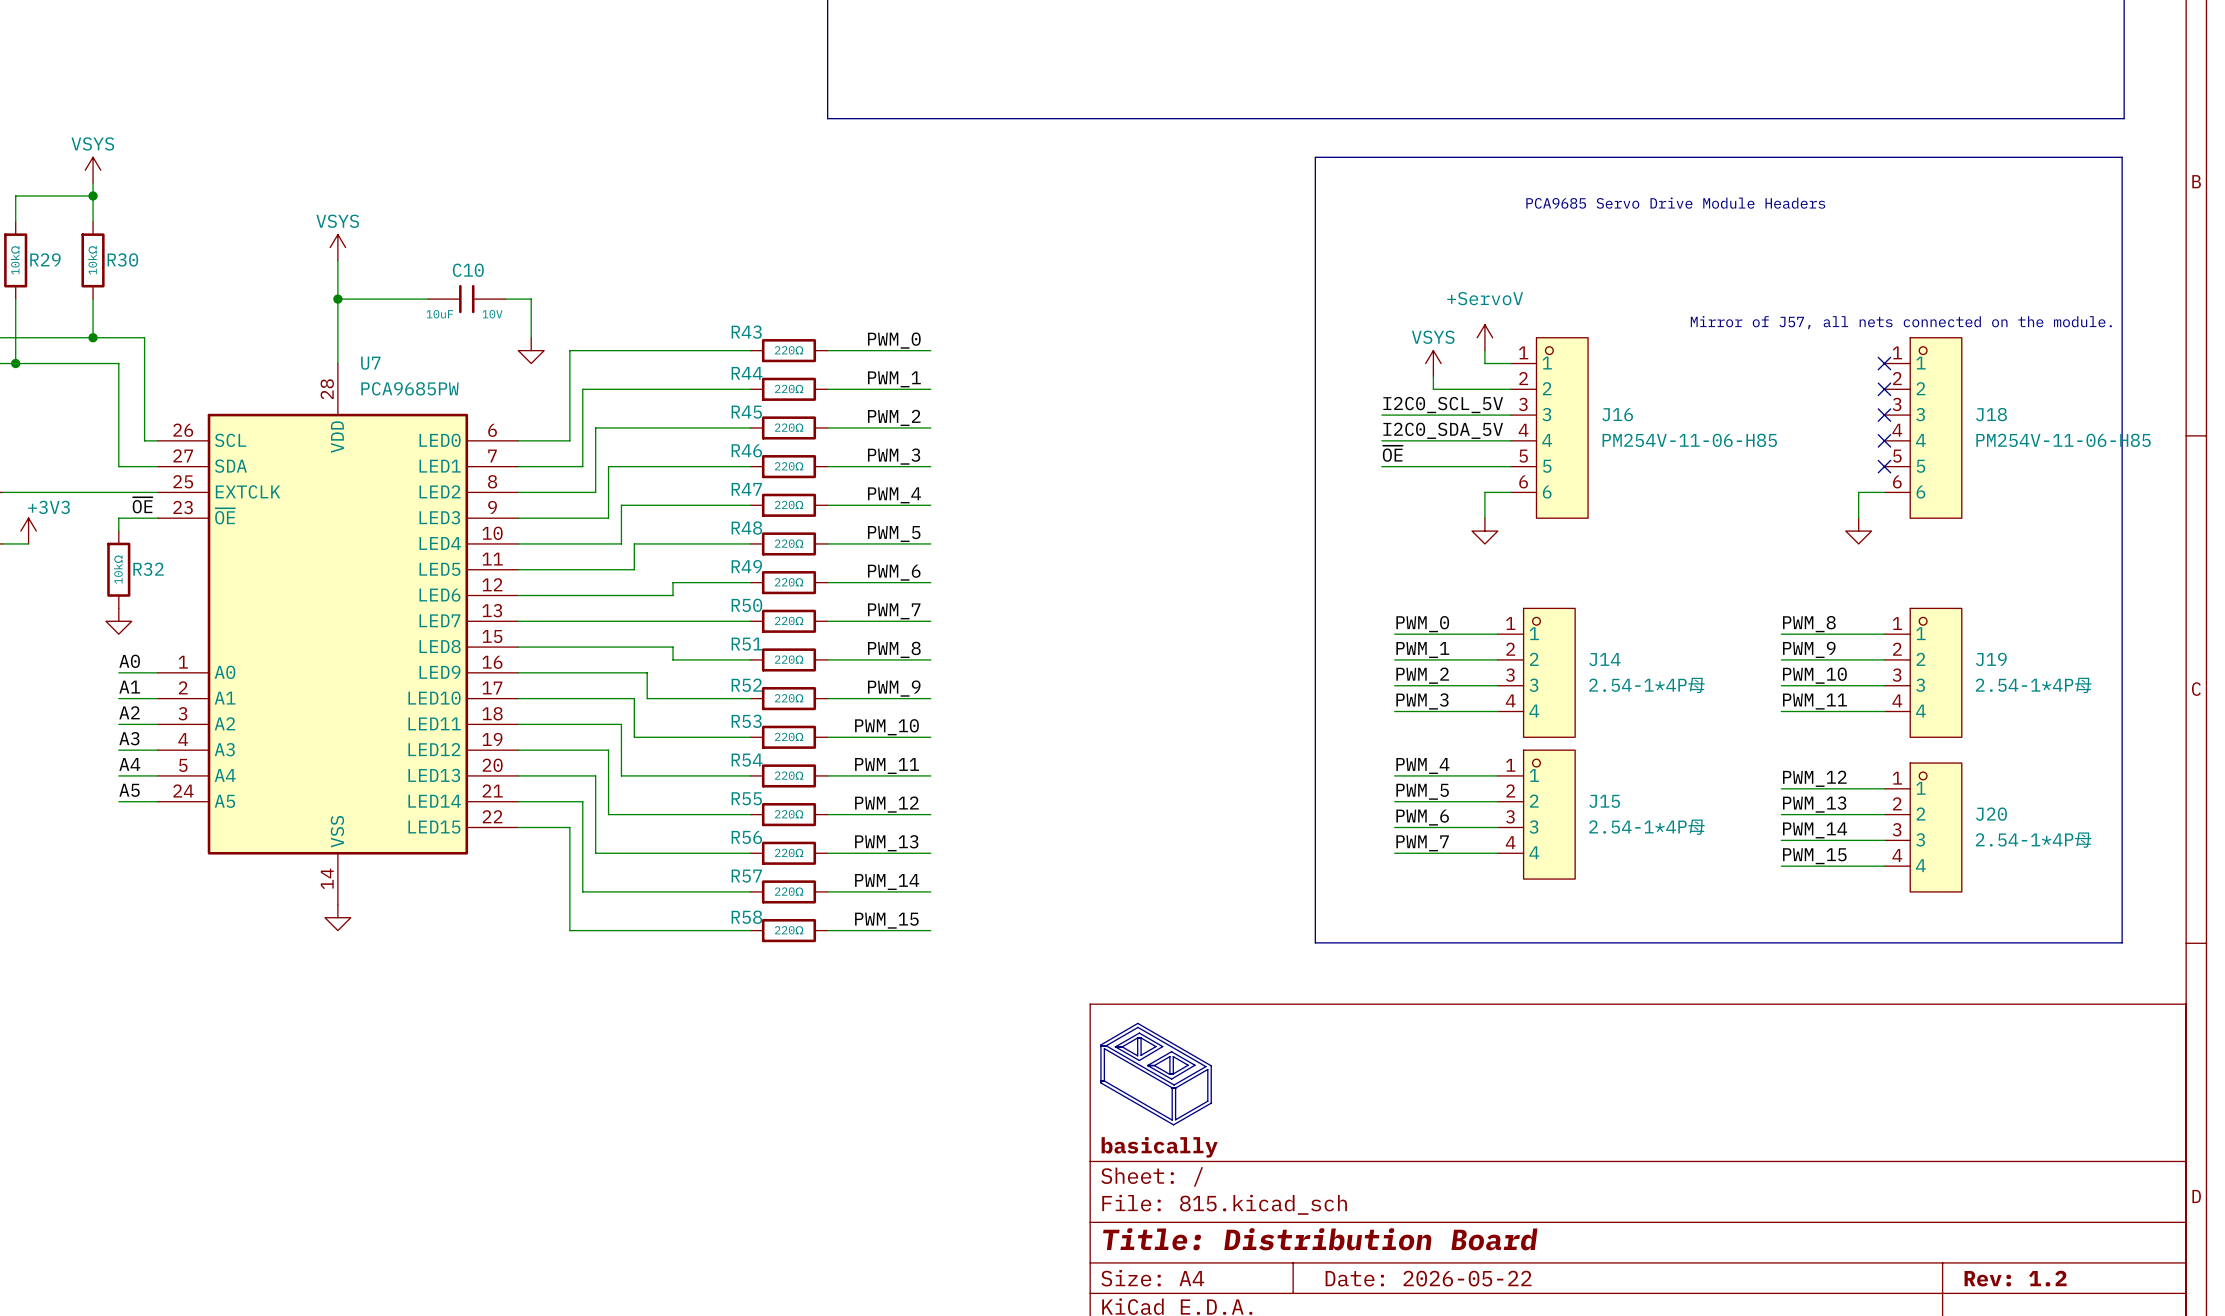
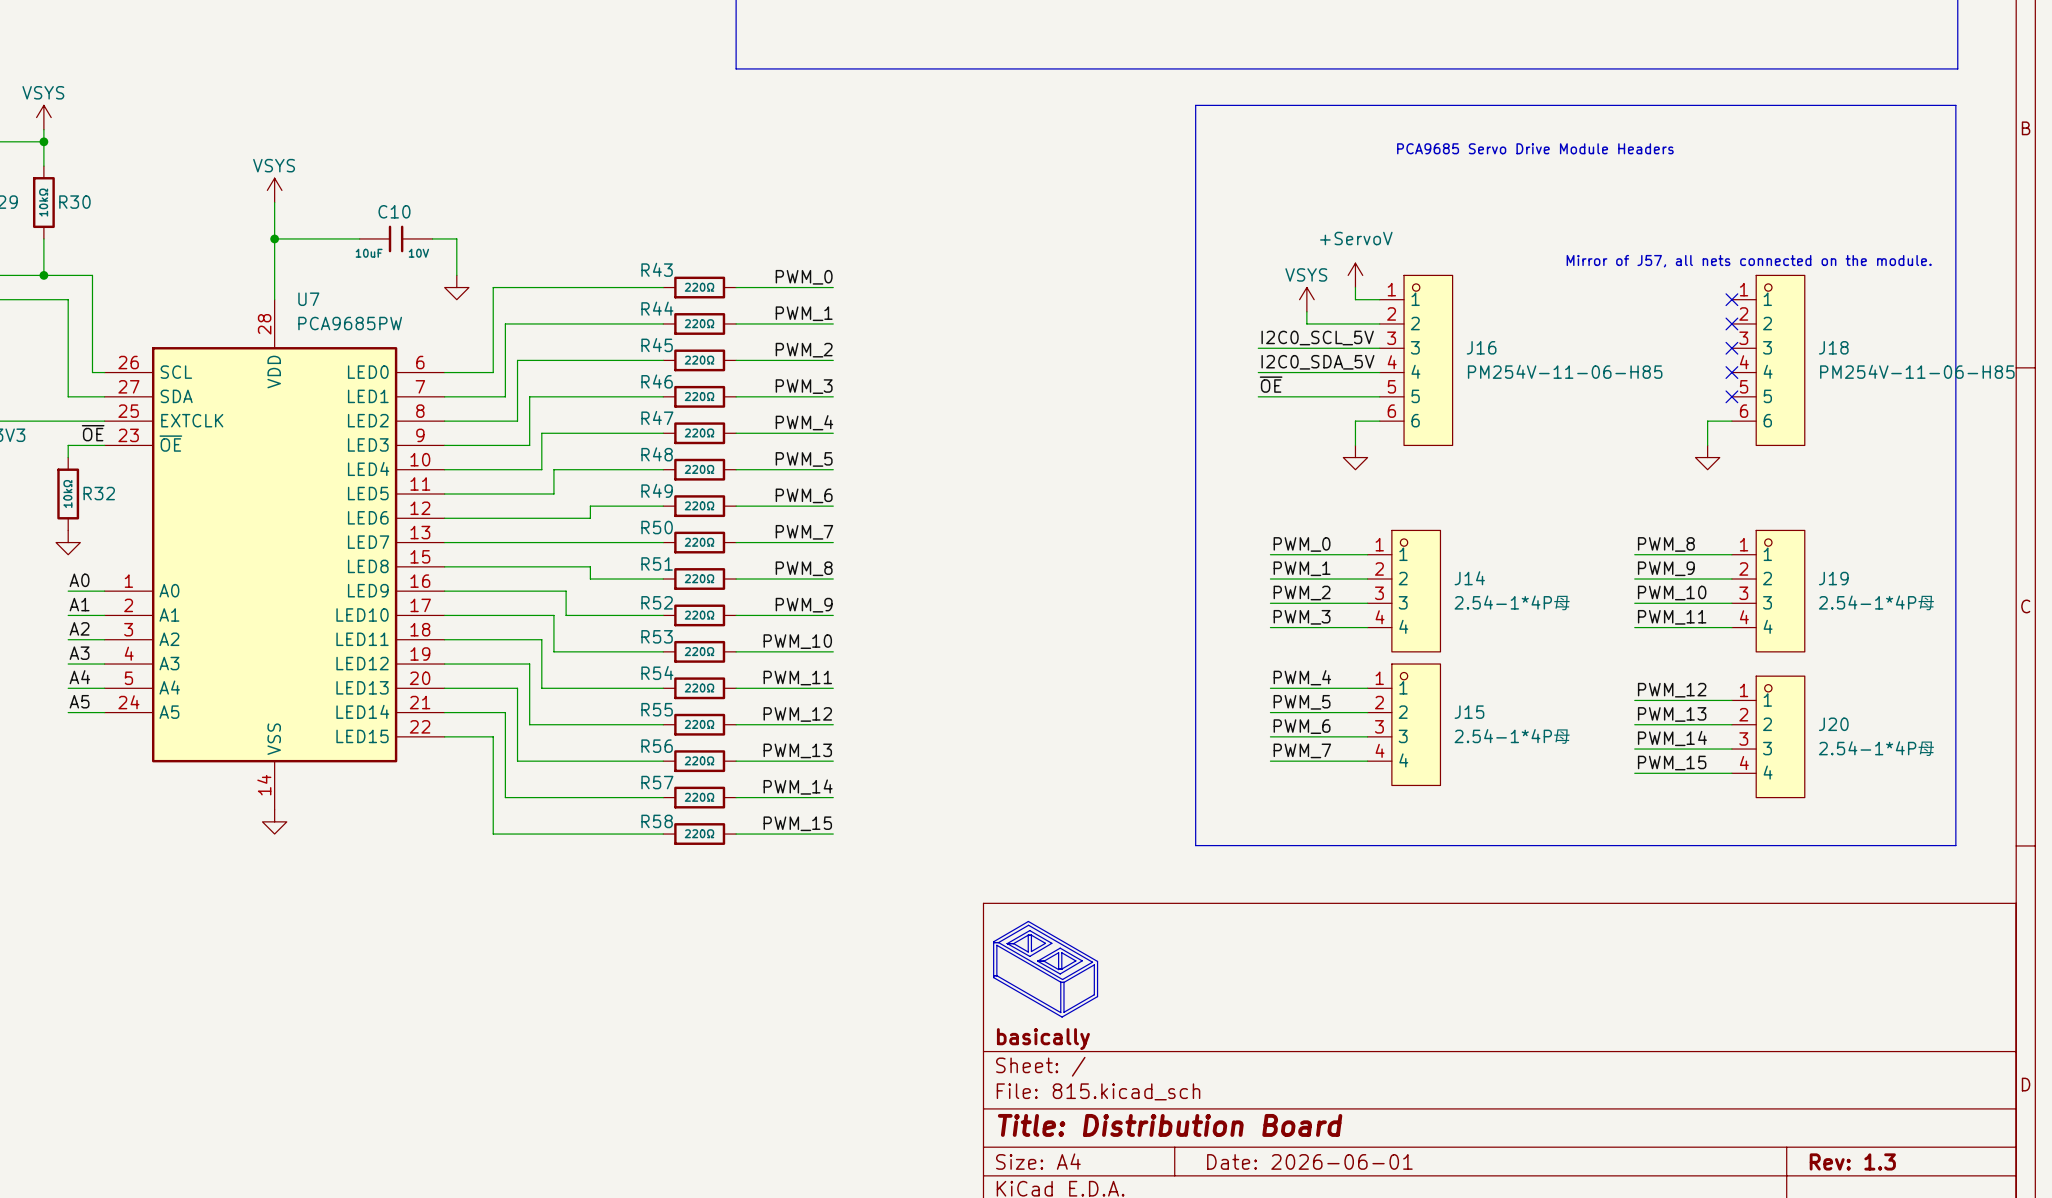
title block: Date: 2026-05-22 (1428, 1278) -> Date: 2026-06-01 (1309, 1161)
title block: Rev: 1.2 (2015, 1278) -> Rev: 1.3 (1852, 1161)

